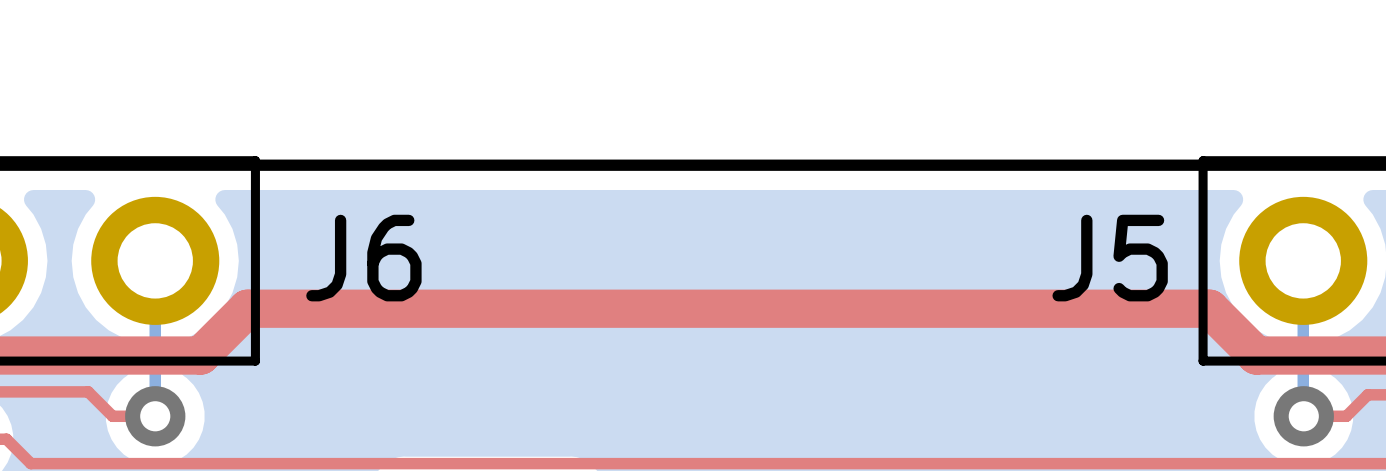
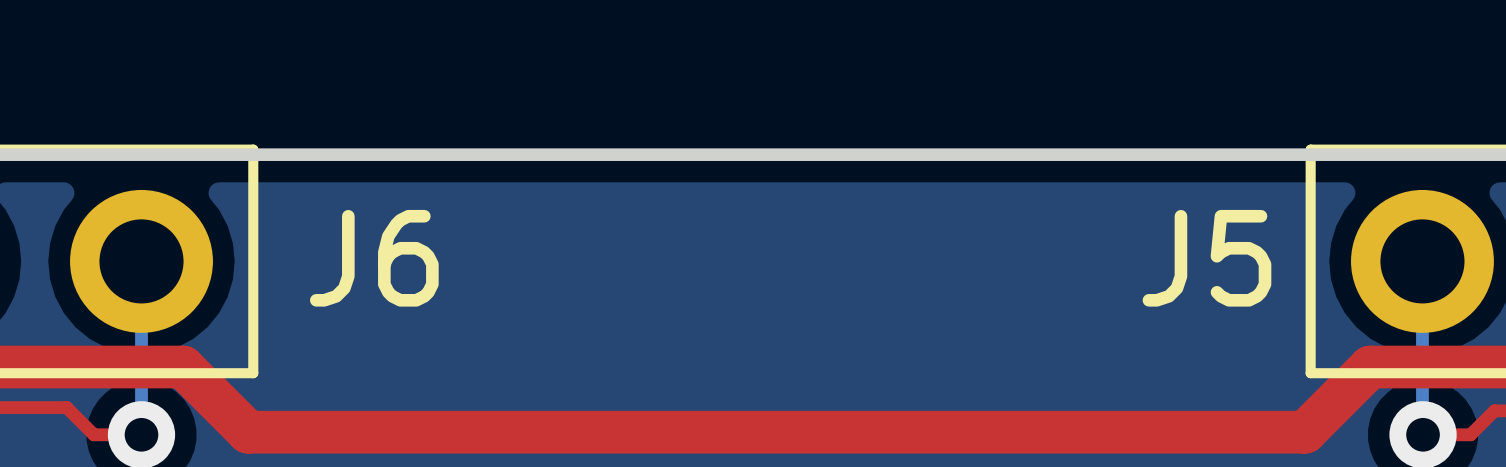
top track: (192, 355) (200, 355) (247, 308) (1209, 308) (1256, 355) -> (183, 367) (248, 432) (1305, 432) (1370, 367)

